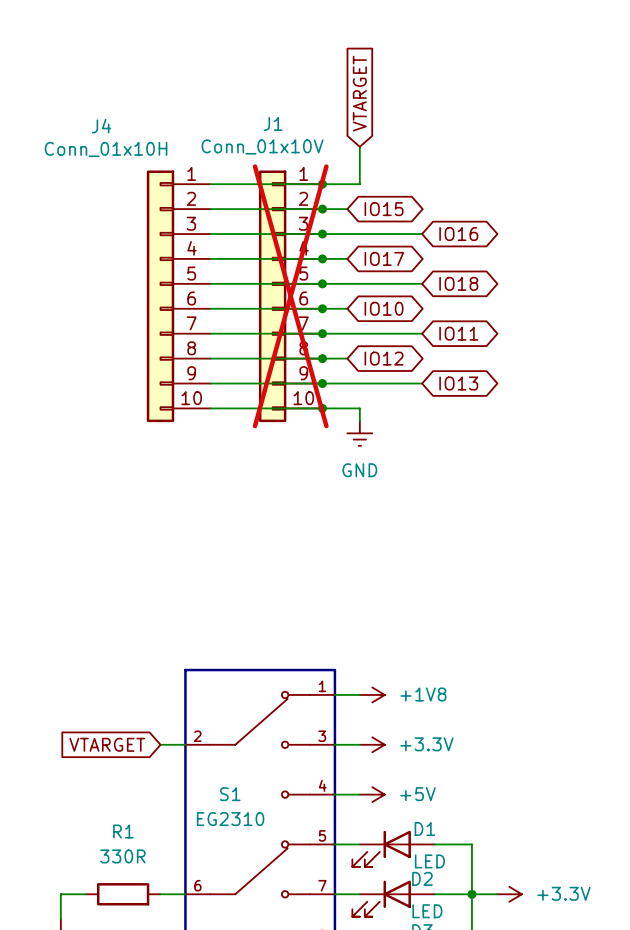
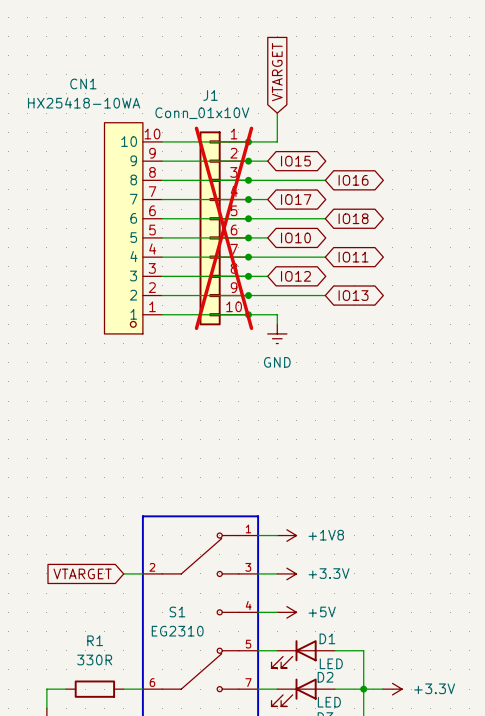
CN1: none -> HX25418-10WA (133, 228)
J4: Conn_01x10H (178, 296) -> none

